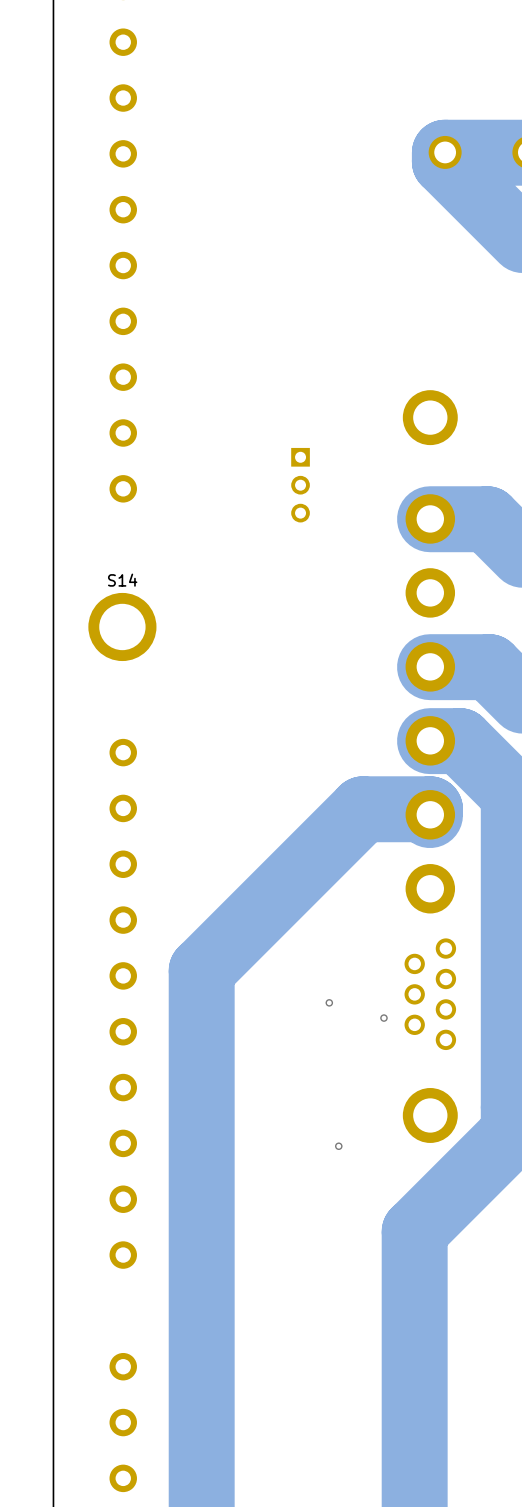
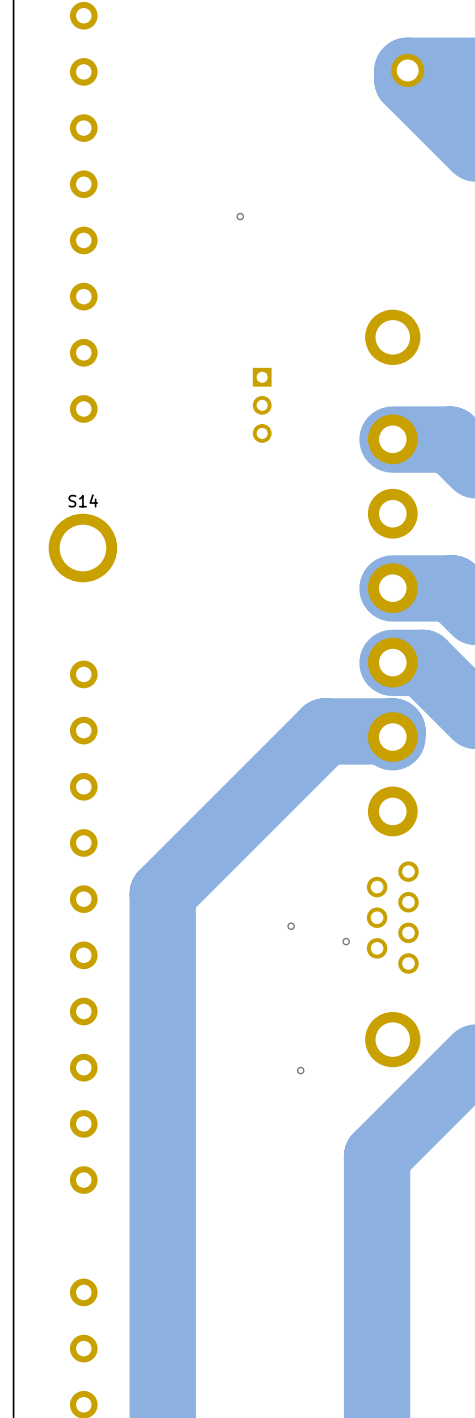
via: none -> (240, 216)

